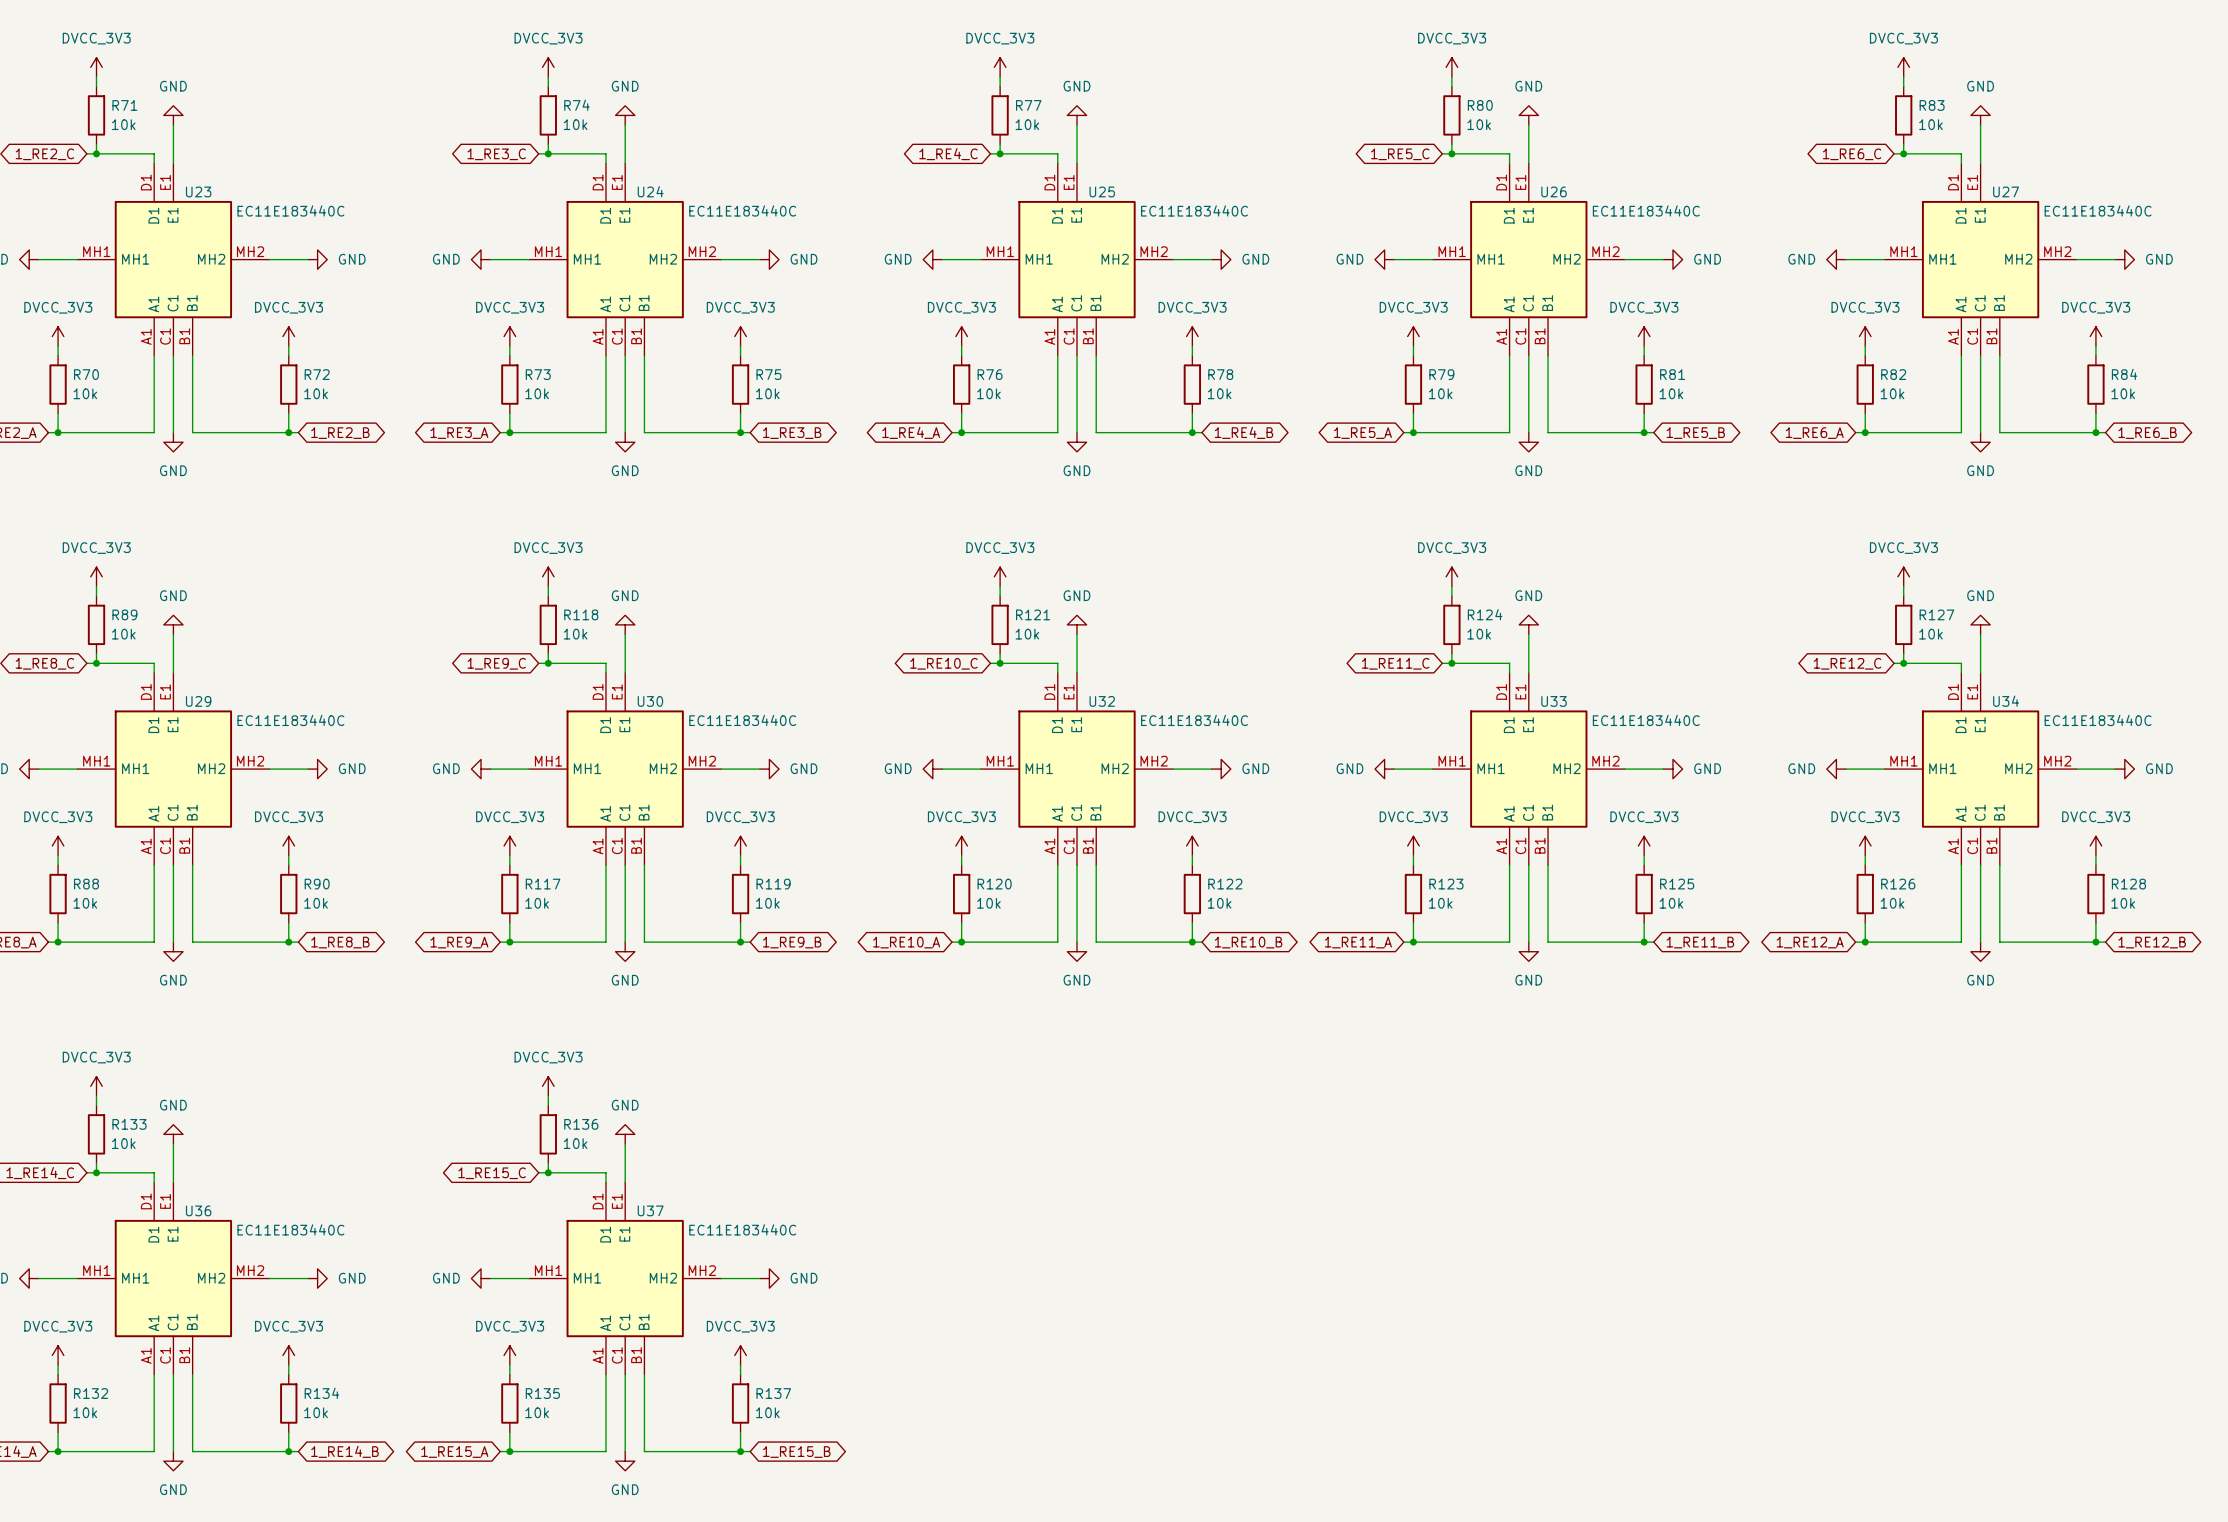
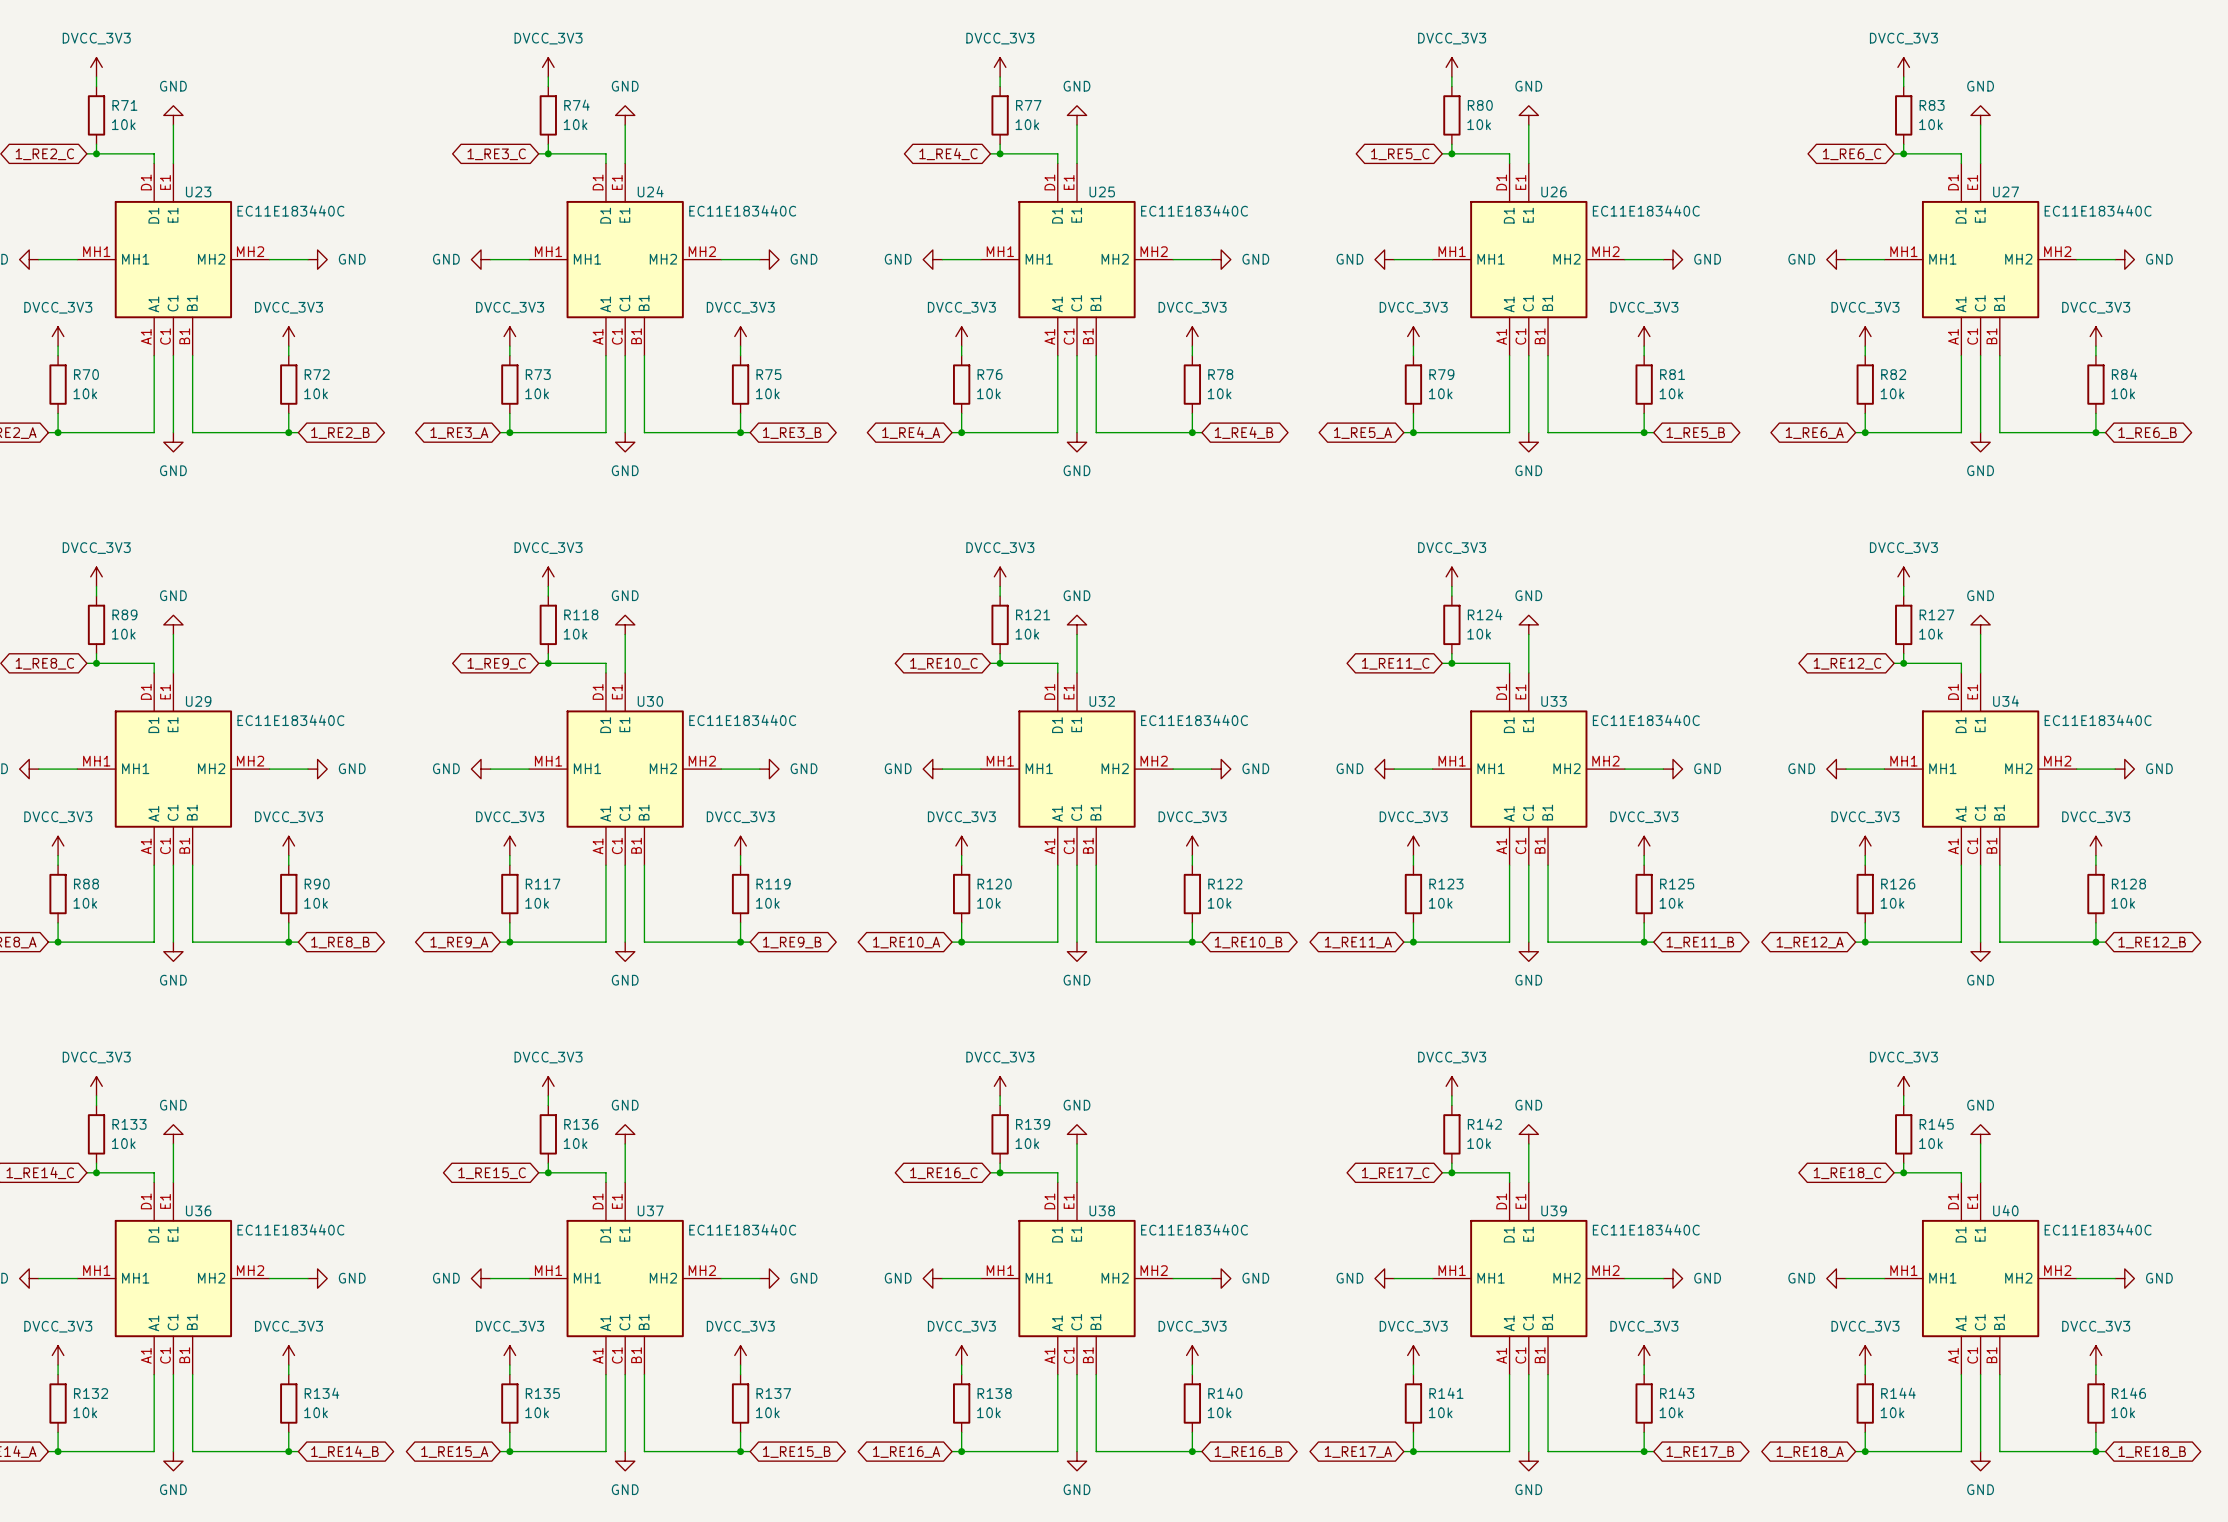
power symbol: none -> DVCC_3V3 (1000, 1086)
power symbol: none -> DVCC_3V3 (1451, 1086)
power symbol: none -> DVCC_3V3 (1903, 1086)
wire: none -> (1000, 1095) (1000, 1105)
wire: none -> (1451, 1095) (1451, 1105)
wire: none -> (1903, 1095) (1903, 1105)
R139: none -> 10k (1000, 1134)
power symbol: none -> GND (1077, 1134)
R142: none -> 10k (1451, 1134)
power symbol: none -> GND (1528, 1134)
R145: none -> 10k (1903, 1134)
power symbol: none -> GND (1980, 1134)
wire: none -> (1077, 1143) (1077, 1182)
wire: none -> (1528, 1143) (1528, 1182)
wire: none -> (1980, 1143) (1980, 1182)
wire: none -> (1000, 1163) (1000, 1172)
wire: none -> (1451, 1163) (1451, 1172)
wire: none -> (1903, 1163) (1903, 1172)
wire: none -> (990, 1172) (1057, 1172) (1057, 1182)
junction: none -> (1000, 1172)
wire: none -> (1442, 1172) (1509, 1172) (1509, 1182)
junction: none -> (1451, 1172)
wire: none -> (1894, 1172) (1961, 1172) (1961, 1182)
junction: none -> (1903, 1172)
global label: none -> 1_RE16_C (943, 1173)
global label: none -> 1_RE17_C (1395, 1173)
global label: none -> 1_RE18_C (1847, 1173)
power symbol: none -> GND (932, 1278)
wire: none -> (942, 1278) (980, 1278)
U38: none -> EC11E183440C (1077, 1278)
wire: none -> (1173, 1278) (1211, 1278)
power symbol: none -> GND (1221, 1278)
power symbol: none -> GND (1384, 1278)
wire: none -> (1394, 1278) (1432, 1278)
U39: none -> EC11E183440C (1528, 1278)
wire: none -> (1624, 1278) (1663, 1278)
power symbol: none -> GND (1672, 1278)
power symbol: none -> GND (1836, 1278)
wire: none -> (1846, 1278) (1884, 1278)
U40: none -> EC11E183440C (1980, 1278)
wire: none -> (2076, 1278) (2115, 1278)
power symbol: none -> GND (2124, 1278)
power symbol: none -> DVCC_3V3 (961, 1355)
power symbol: none -> DVCC_3V3 (1192, 1355)
power symbol: none -> DVCC_3V3 (1413, 1355)
power symbol: none -> DVCC_3V3 (1644, 1355)
power symbol: none -> DVCC_3V3 (1865, 1355)
power symbol: none -> DVCC_3V3 (2095, 1355)
wire: none -> (961, 1365) (961, 1374)
wire: none -> (1192, 1365) (1192, 1374)
wire: none -> (1413, 1365) (1413, 1374)
wire: none -> (1644, 1365) (1644, 1374)
wire: none -> (1865, 1365) (1865, 1374)
wire: none -> (2095, 1365) (2095, 1374)
wire: none -> (1057, 1374) (1057, 1451) (952, 1451)
wire: none -> (1077, 1374) (1077, 1451)
wire: none -> (1096, 1374) (1096, 1451) (1201, 1451)
wire: none -> (1509, 1374) (1509, 1451) (1403, 1451)
wire: none -> (1528, 1374) (1528, 1451)
wire: none -> (1548, 1374) (1548, 1451) (1653, 1451)
wire: none -> (1961, 1374) (1961, 1451) (1855, 1451)
wire: none -> (1980, 1374) (1980, 1451)
wire: none -> (1999, 1374) (1999, 1451) (2105, 1451)
R138: none -> 10k (961, 1403)
R140: none -> 10k (1192, 1403)
R141: none -> 10k (1413, 1403)
R143: none -> 10k (1644, 1403)
R144: none -> 10k (1865, 1403)
R146: none -> 10k (2095, 1403)
wire: none -> (961, 1432) (961, 1451)
wire: none -> (1192, 1432) (1192, 1451)
wire: none -> (1413, 1432) (1413, 1451)
wire: none -> (1644, 1432) (1644, 1451)
wire: none -> (1865, 1432) (1865, 1451)
wire: none -> (2095, 1432) (2095, 1451)
junction: none -> (961, 1451)
junction: none -> (1192, 1451)
junction: none -> (1413, 1451)
junction: none -> (1644, 1451)
junction: none -> (1865, 1451)
junction: none -> (2095, 1451)
global label: none -> 1_RE16_A (906, 1452)
global label: none -> 1_RE16_B (1248, 1452)
global label: none -> 1_RE17_A (1358, 1452)
global label: none -> 1_RE17_B (1700, 1452)
global label: none -> 1_RE18_A (1810, 1452)
global label: none -> 1_RE18_B (2152, 1452)
power symbol: none -> GND (1077, 1461)
power symbol: none -> GND (1528, 1461)
power symbol: none -> GND (1980, 1461)

